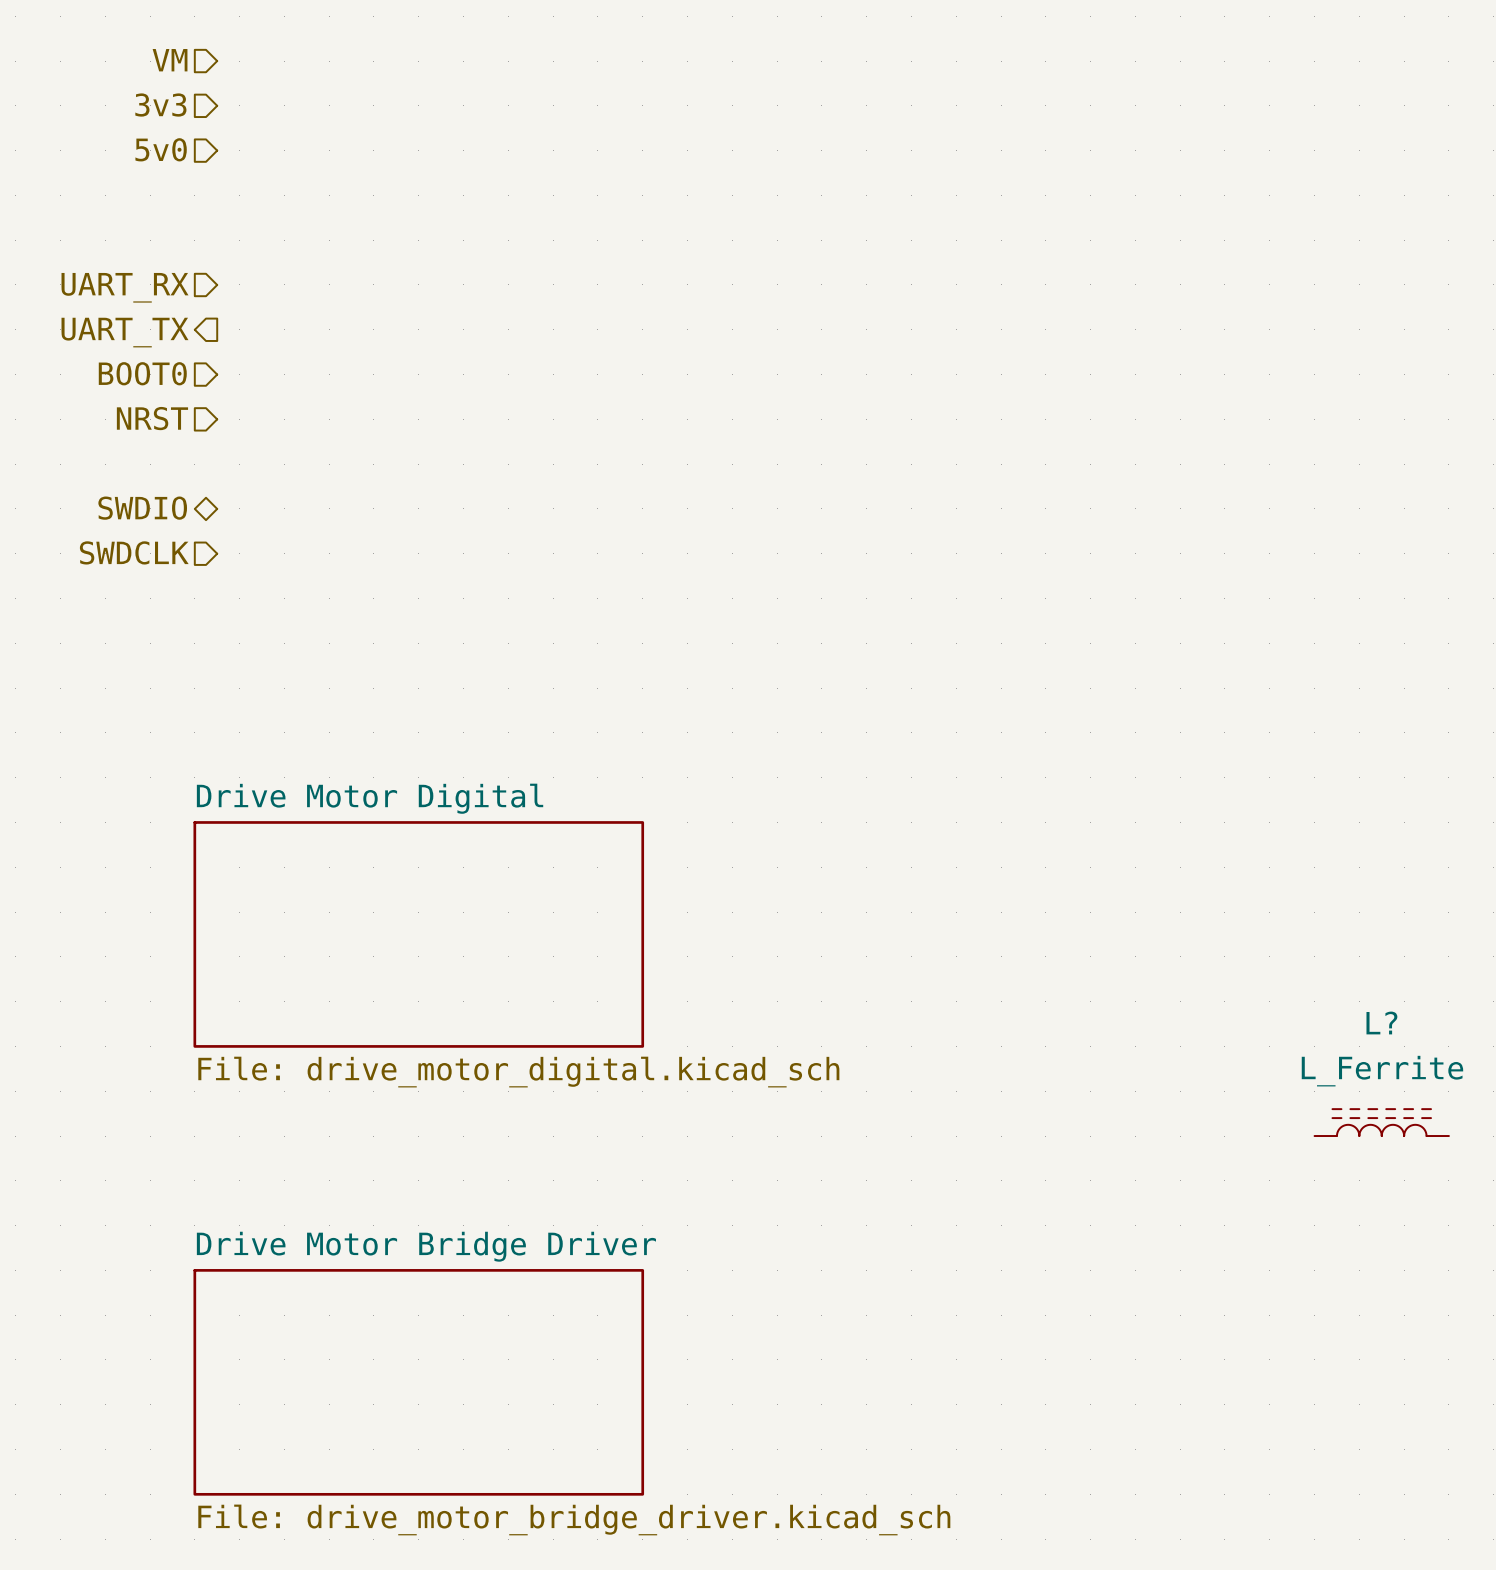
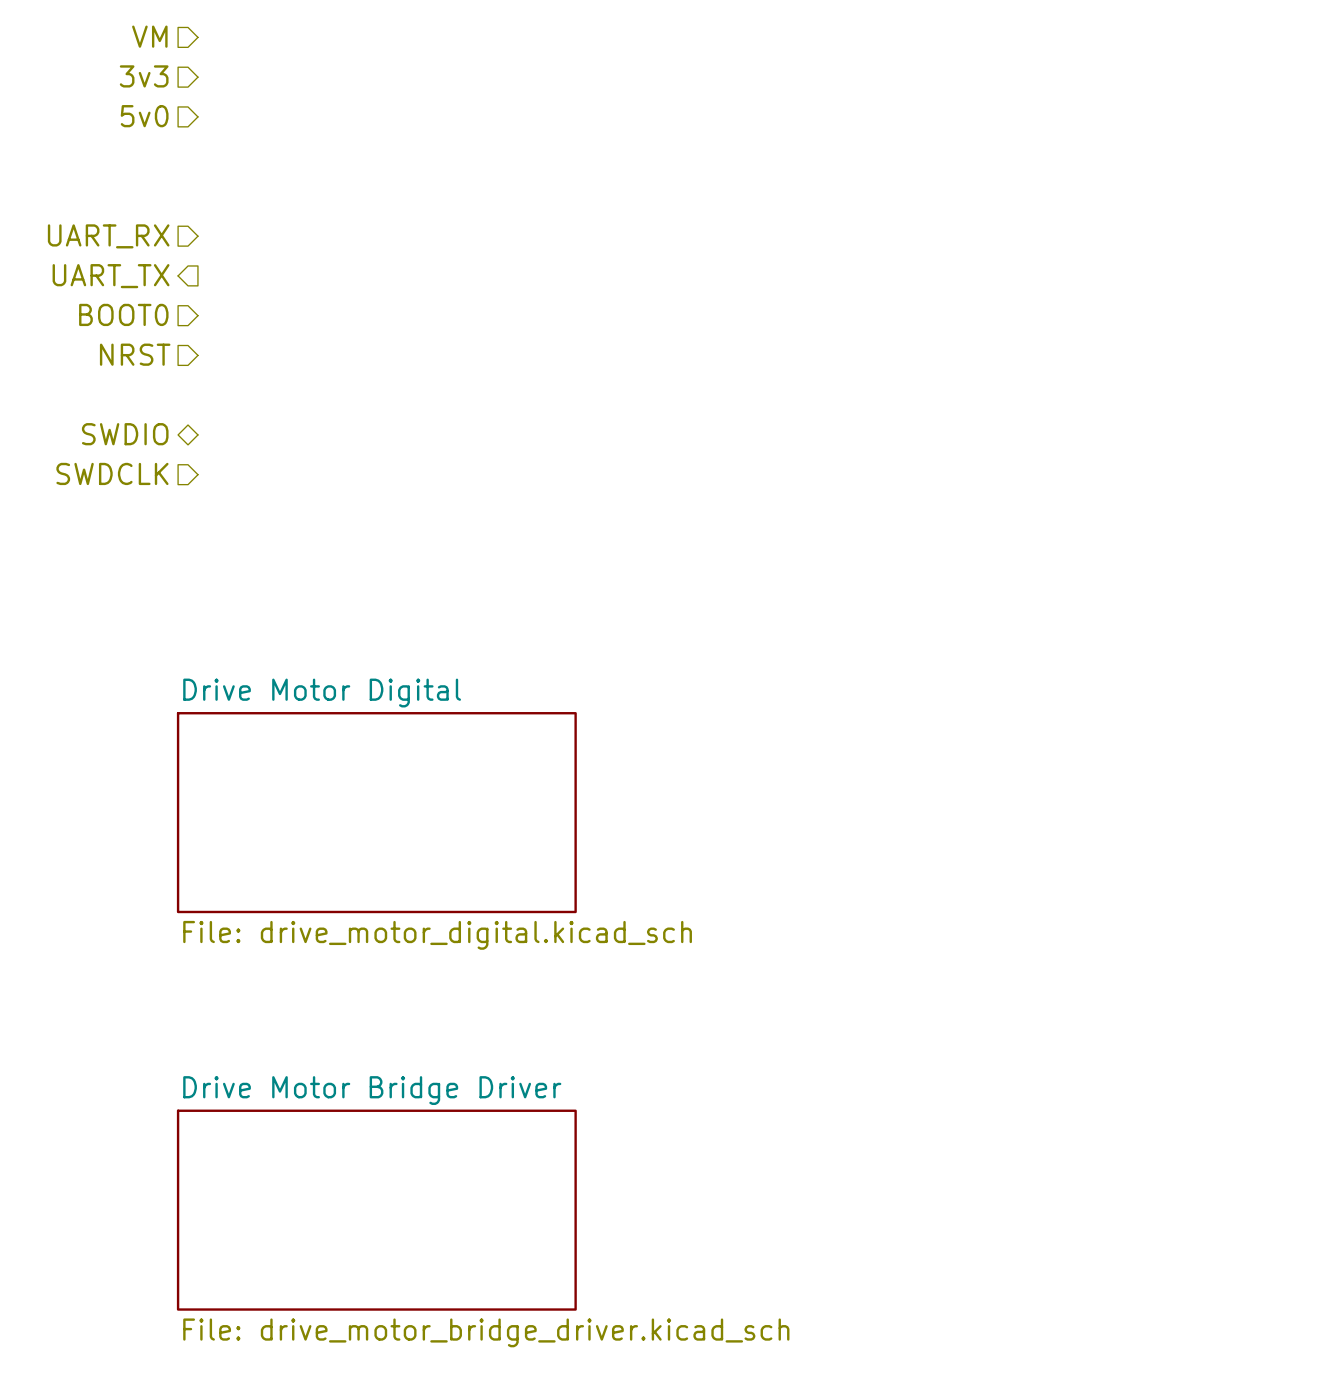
L?: L_Ferrite (1381, 1122) -> none

